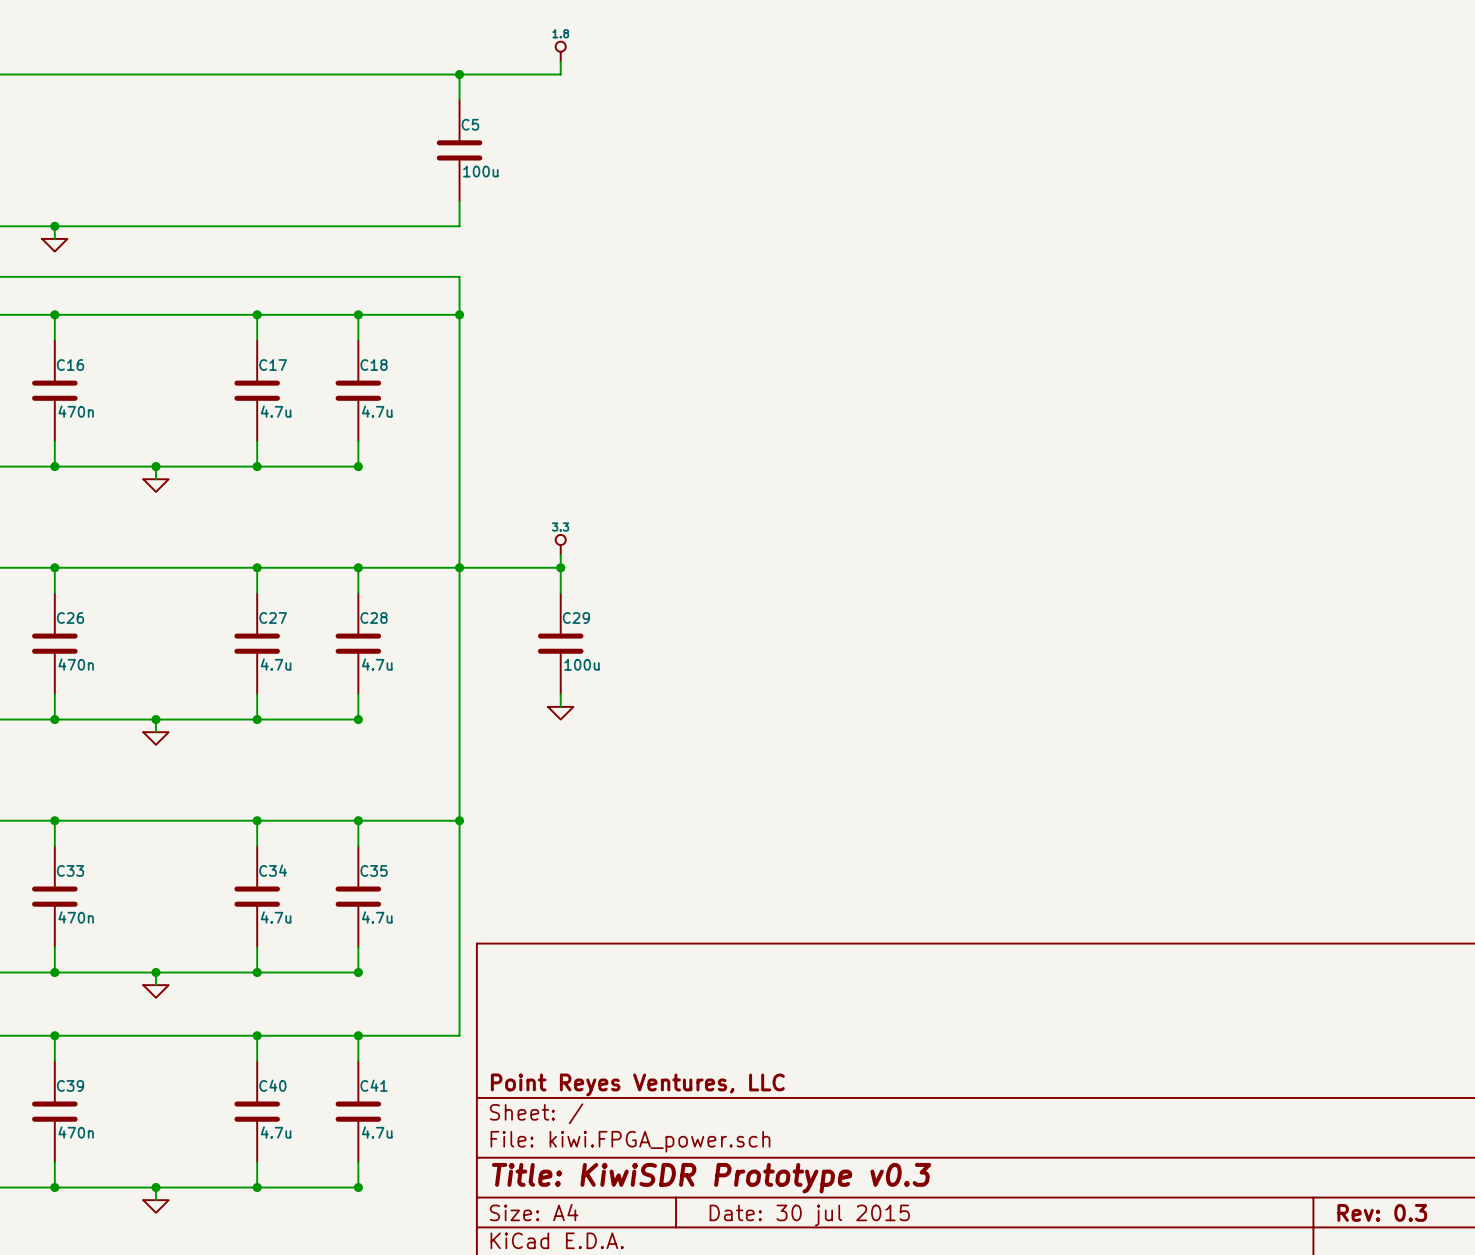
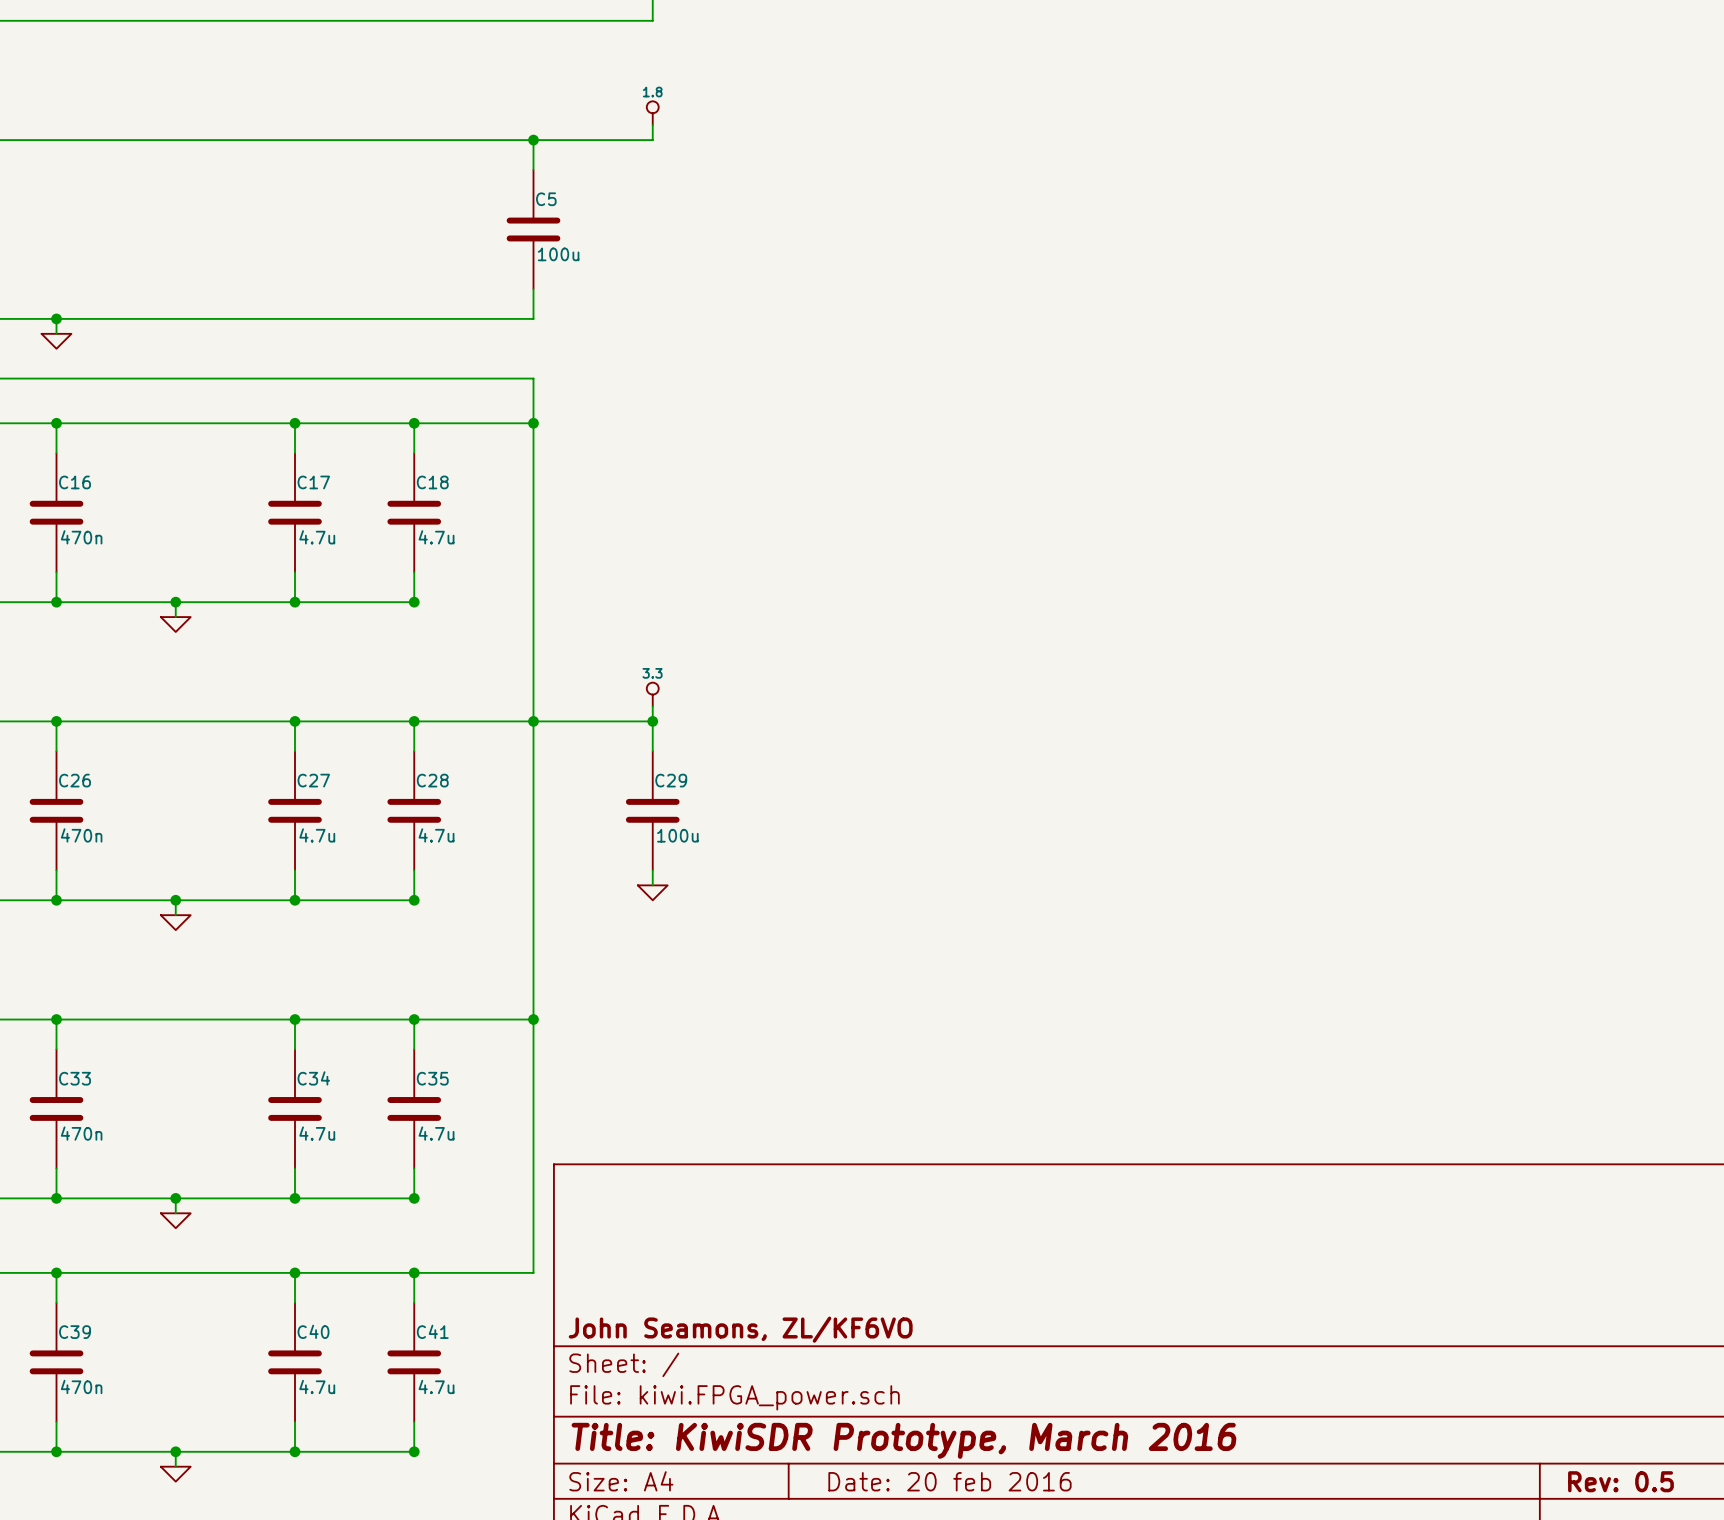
title block: Point Reyes Ventures, LLC (637, 1084) -> John Seamons, ZL/KF6VO (740, 1329)
title block: Title: KiwiSDR Prototype v0.3 (711, 1178) -> Title: KiwiSDR Prototype, March 2016 (903, 1440)
title block: Rev: 0.3 (1382, 1212) -> Rev: 0.5 (1620, 1481)
title block: Date: 30 jul 2015 (809, 1215) -> Date: 20 feb 2016 (949, 1481)

